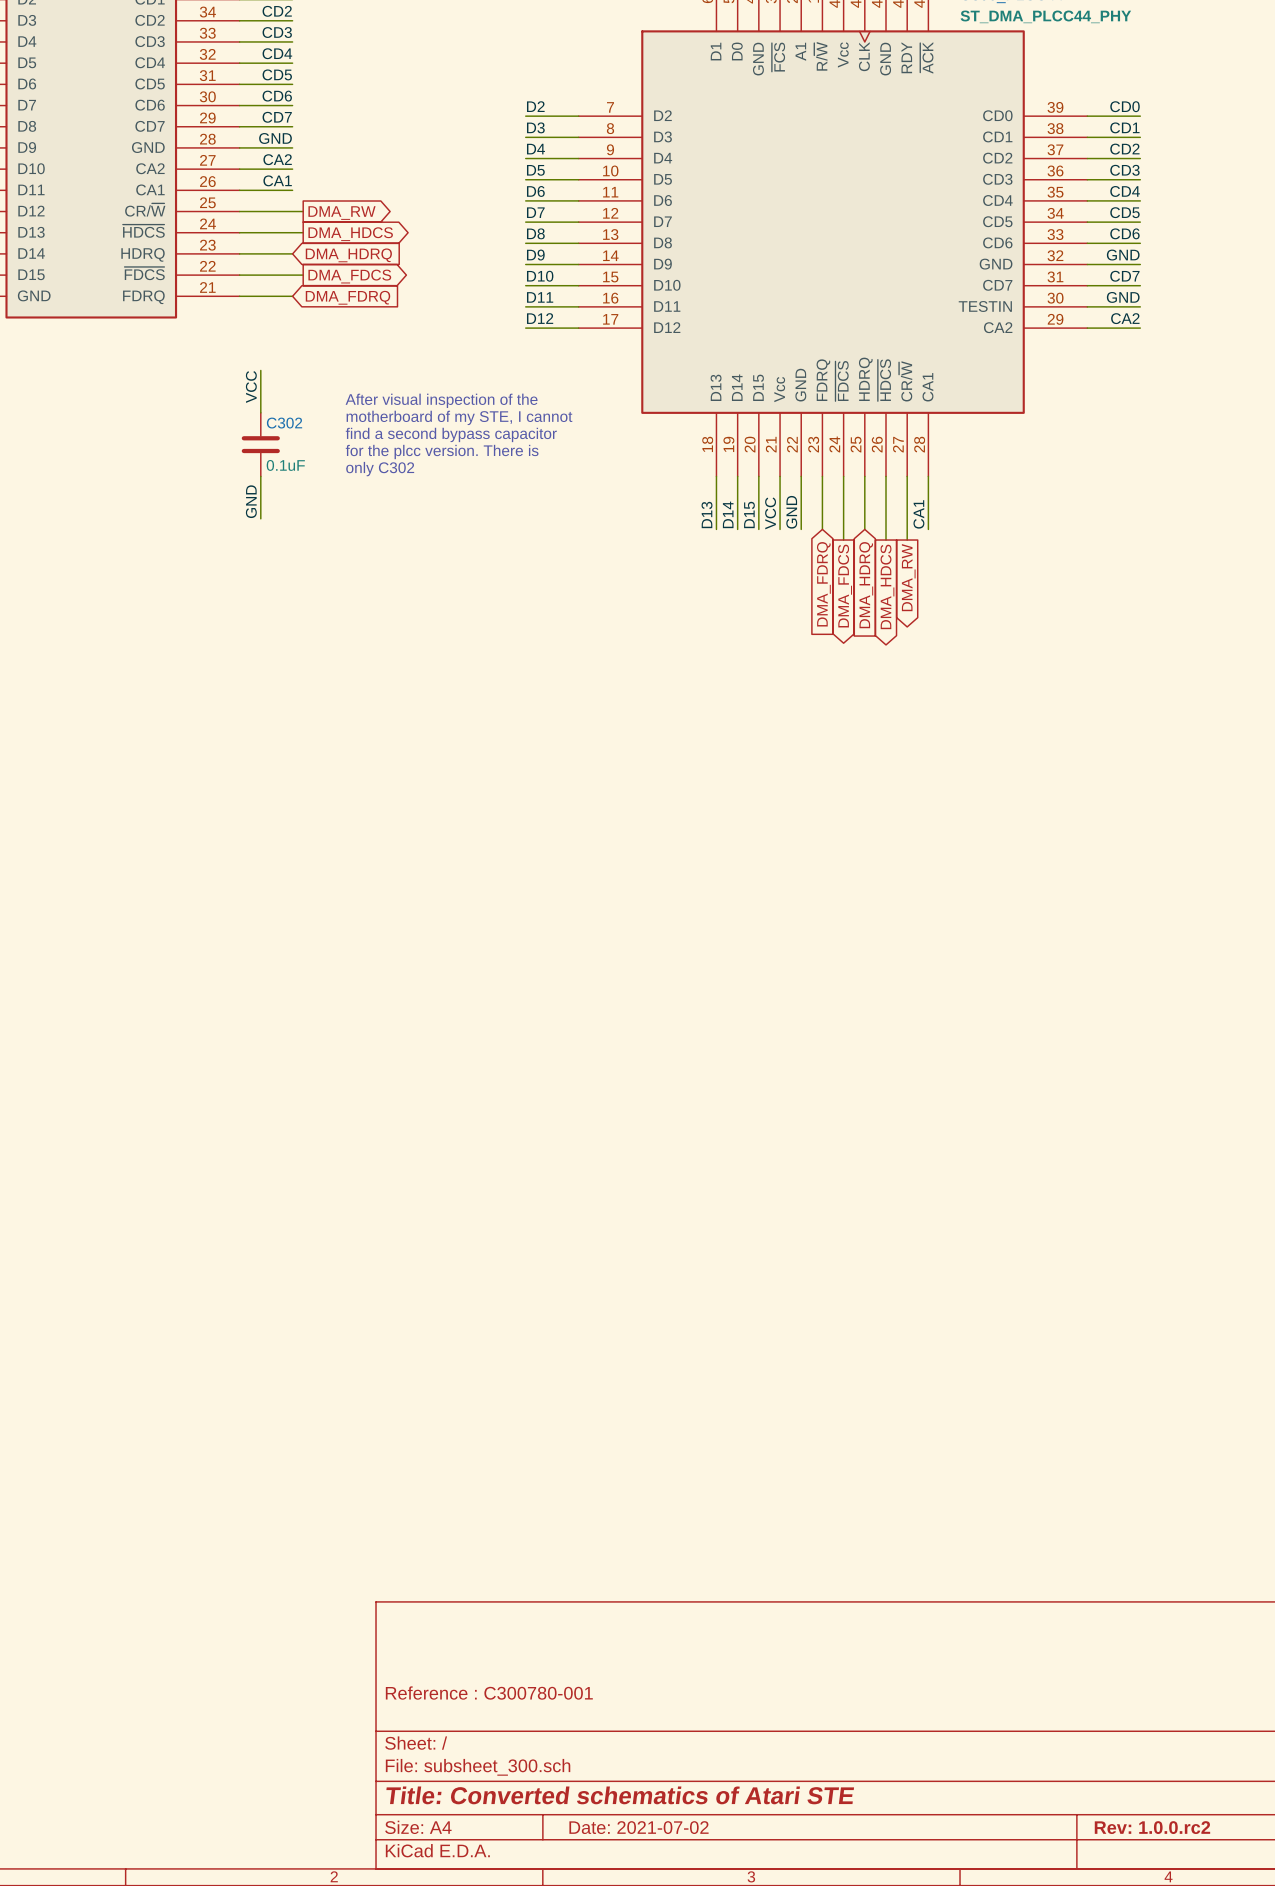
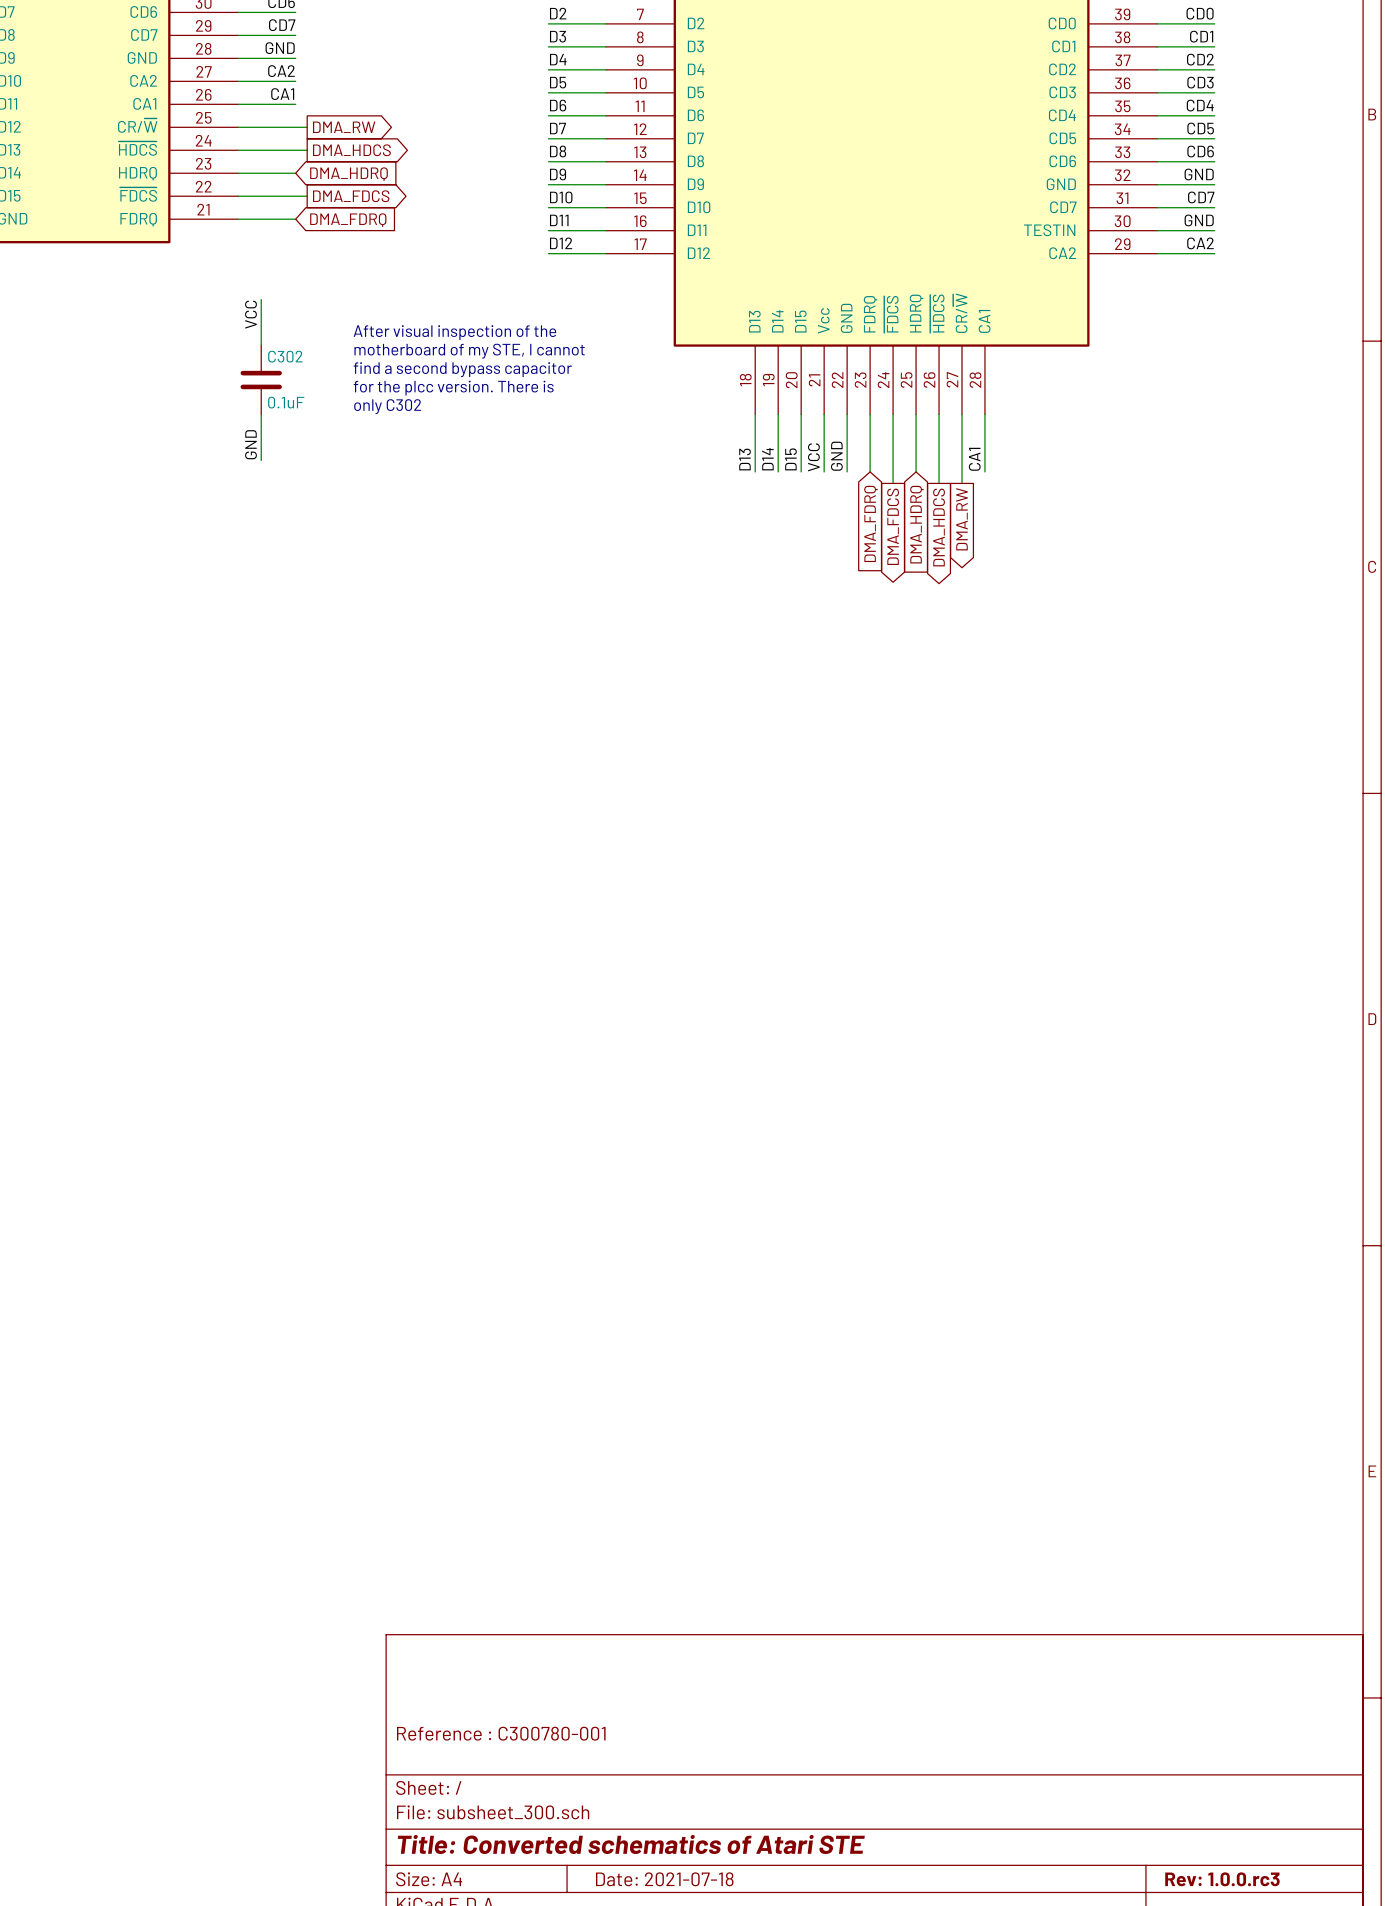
title block: Date: 2021-07-02 (639, 1827) -> Date: 2021-07-18 (664, 1879)
title block: Rev: 1.0.0.rc2 (1152, 1827) -> Rev: 1.0.0.rc3 (1222, 1879)

